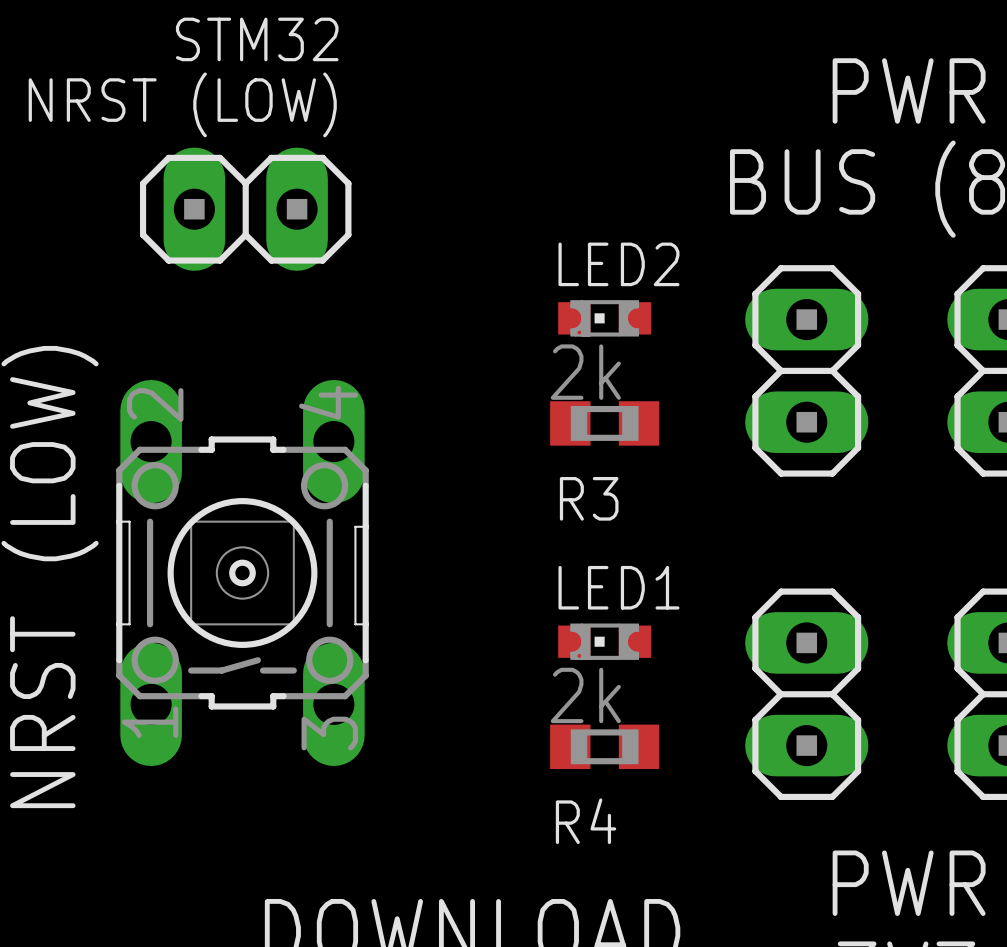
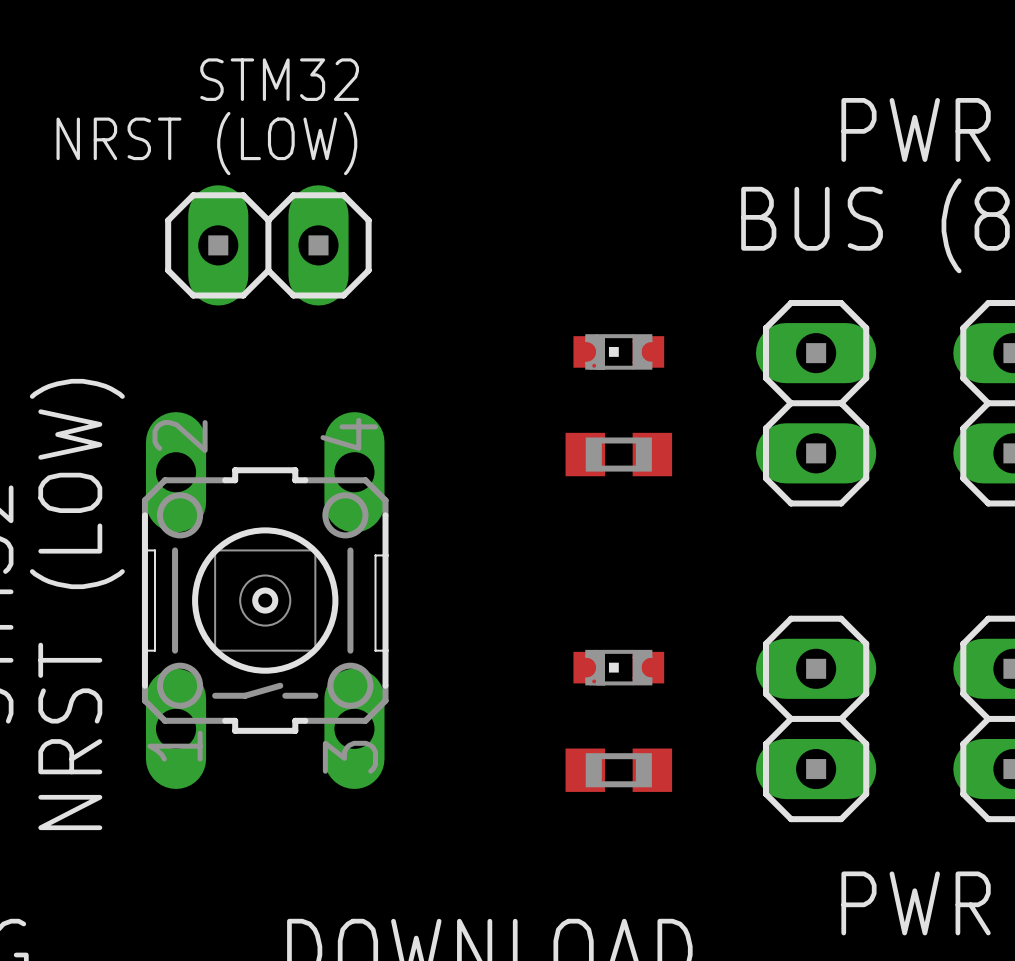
LED2 name: LED2 (618, 264) -> none
R3 value: 2k (585, 372) -> none
R3 name: R3 (589, 498) -> none
LED1 name: LED1 (618, 587) -> none
R4 value: 2k (585, 695) -> none
R4 name: R4 (586, 821) -> none

